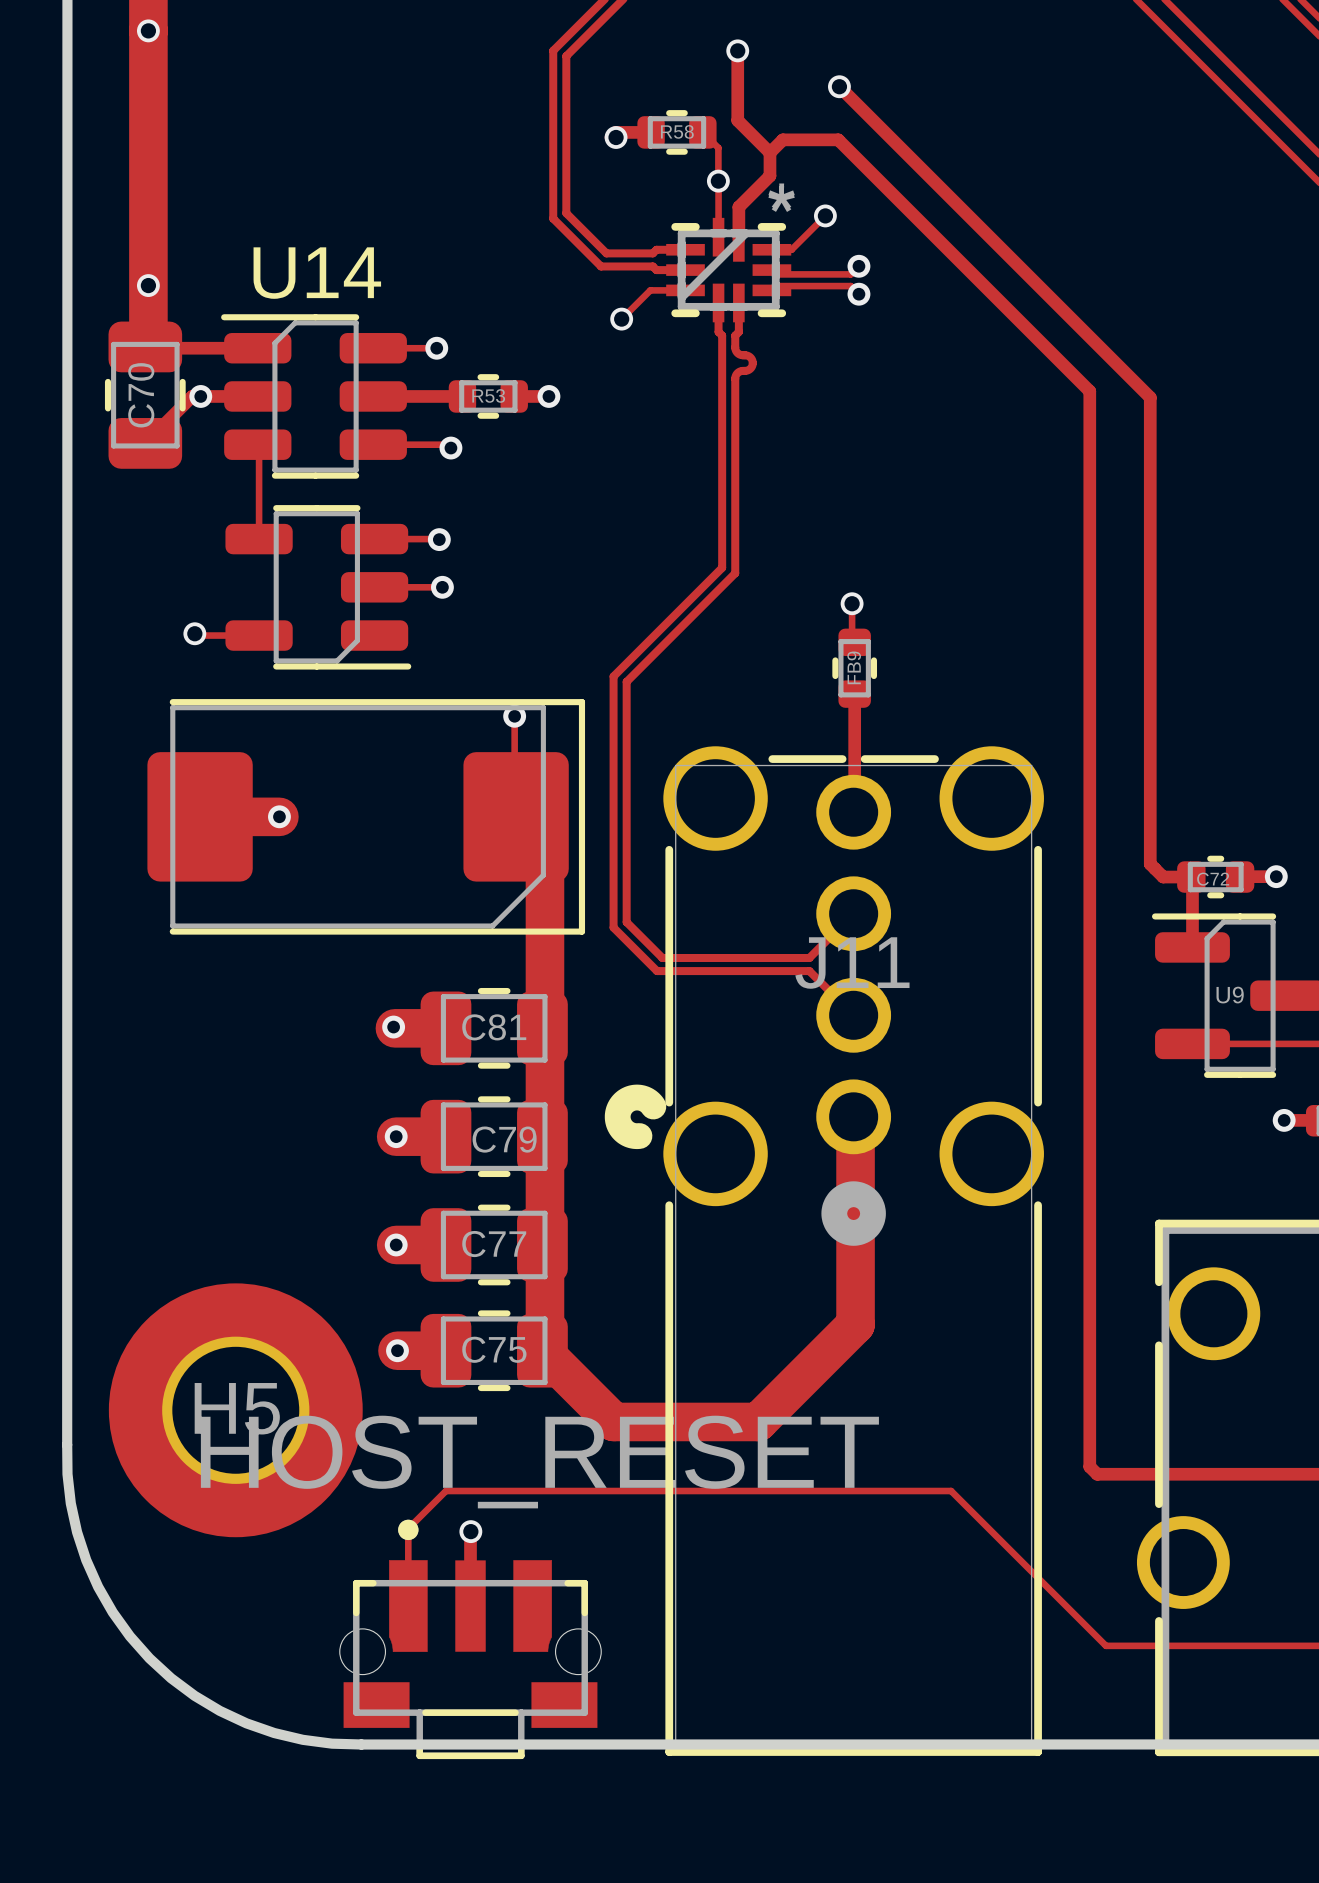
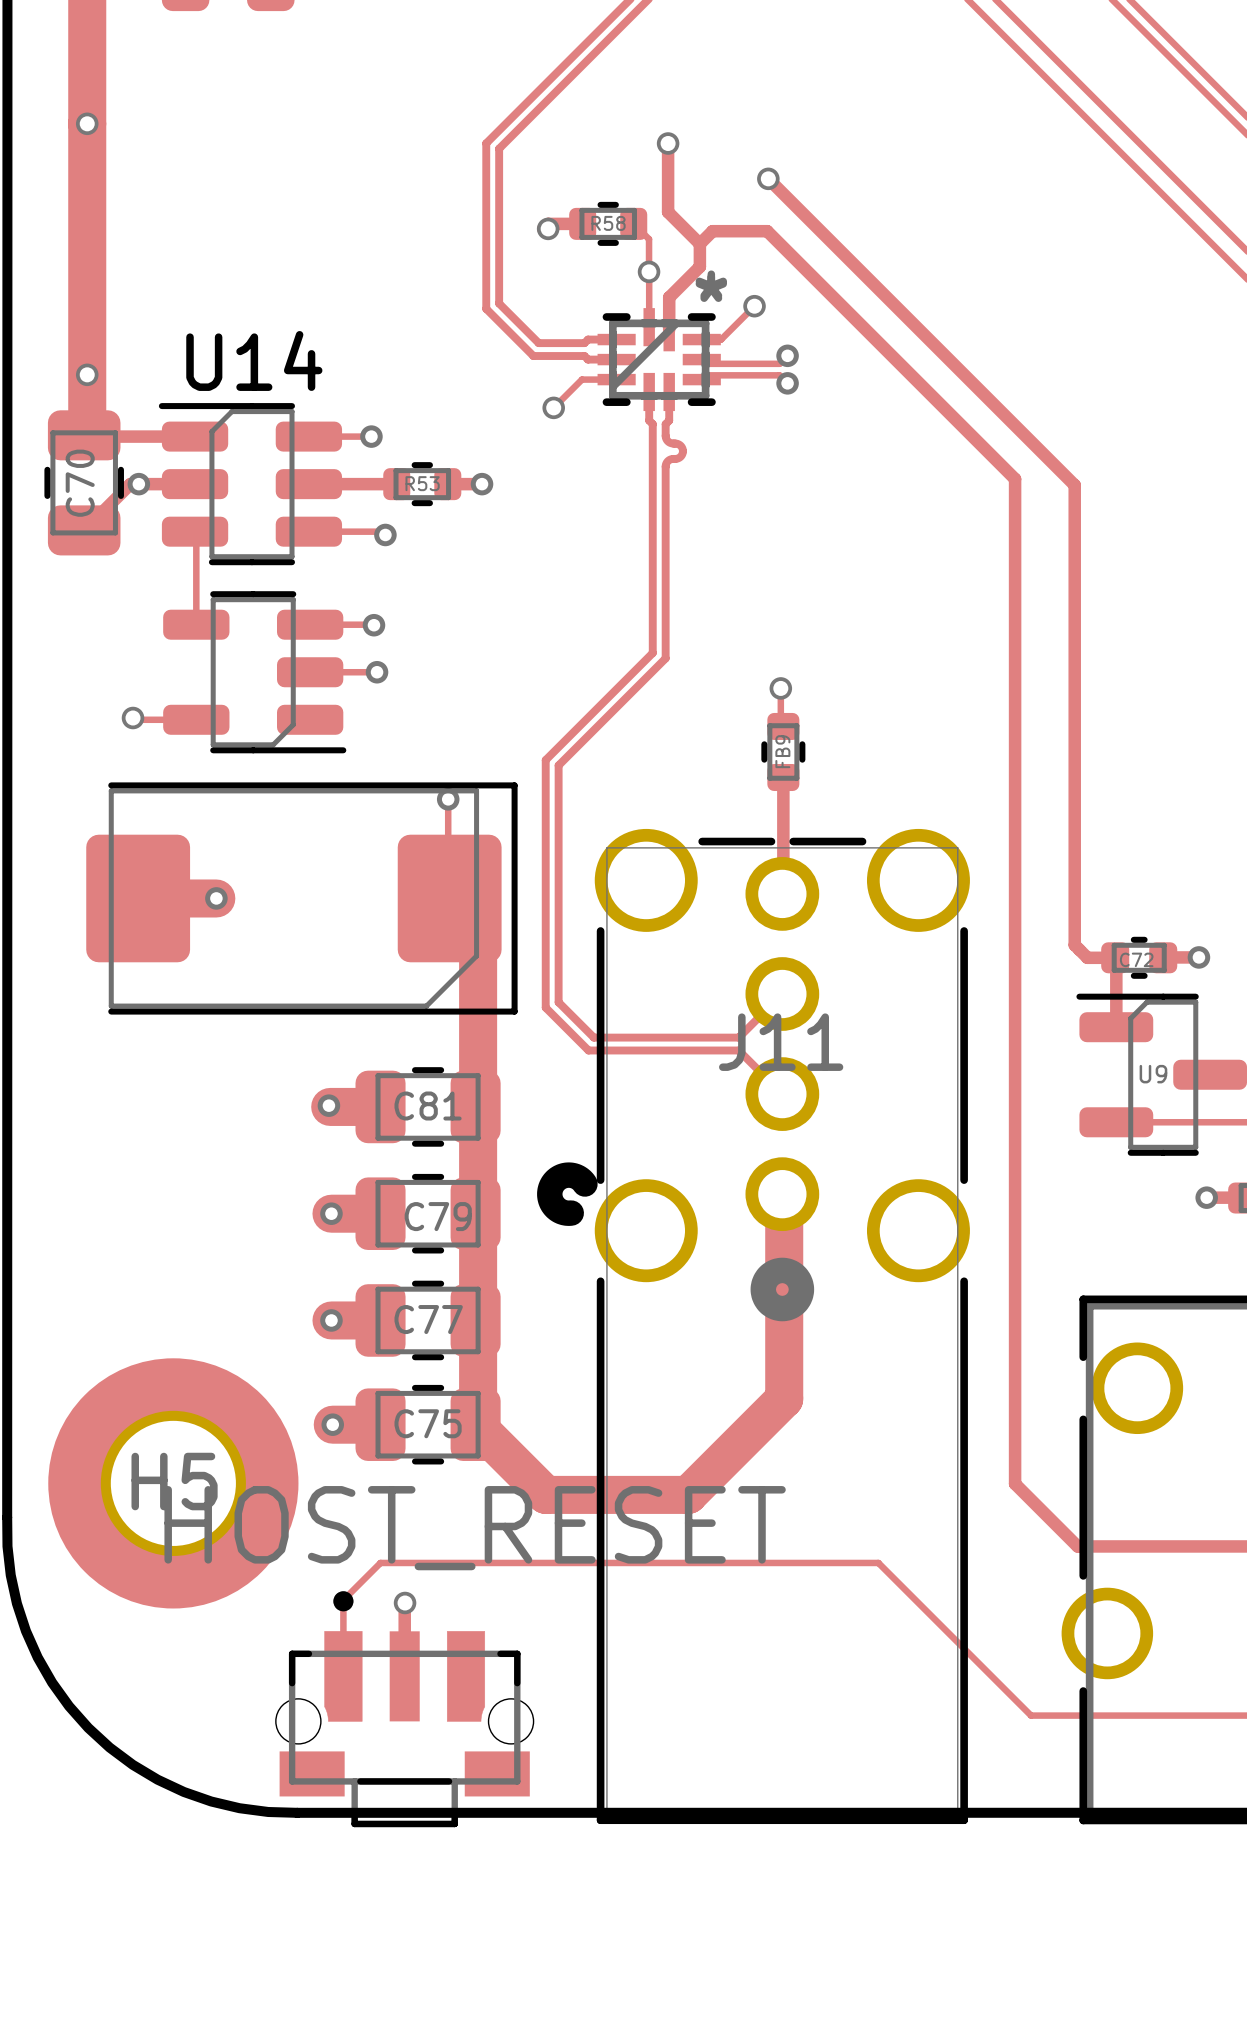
track: (1089, 1410) (1089, 1466) (1097, 1474) (1153, 1474) -> (1015, 1483) (1077, 1546)

